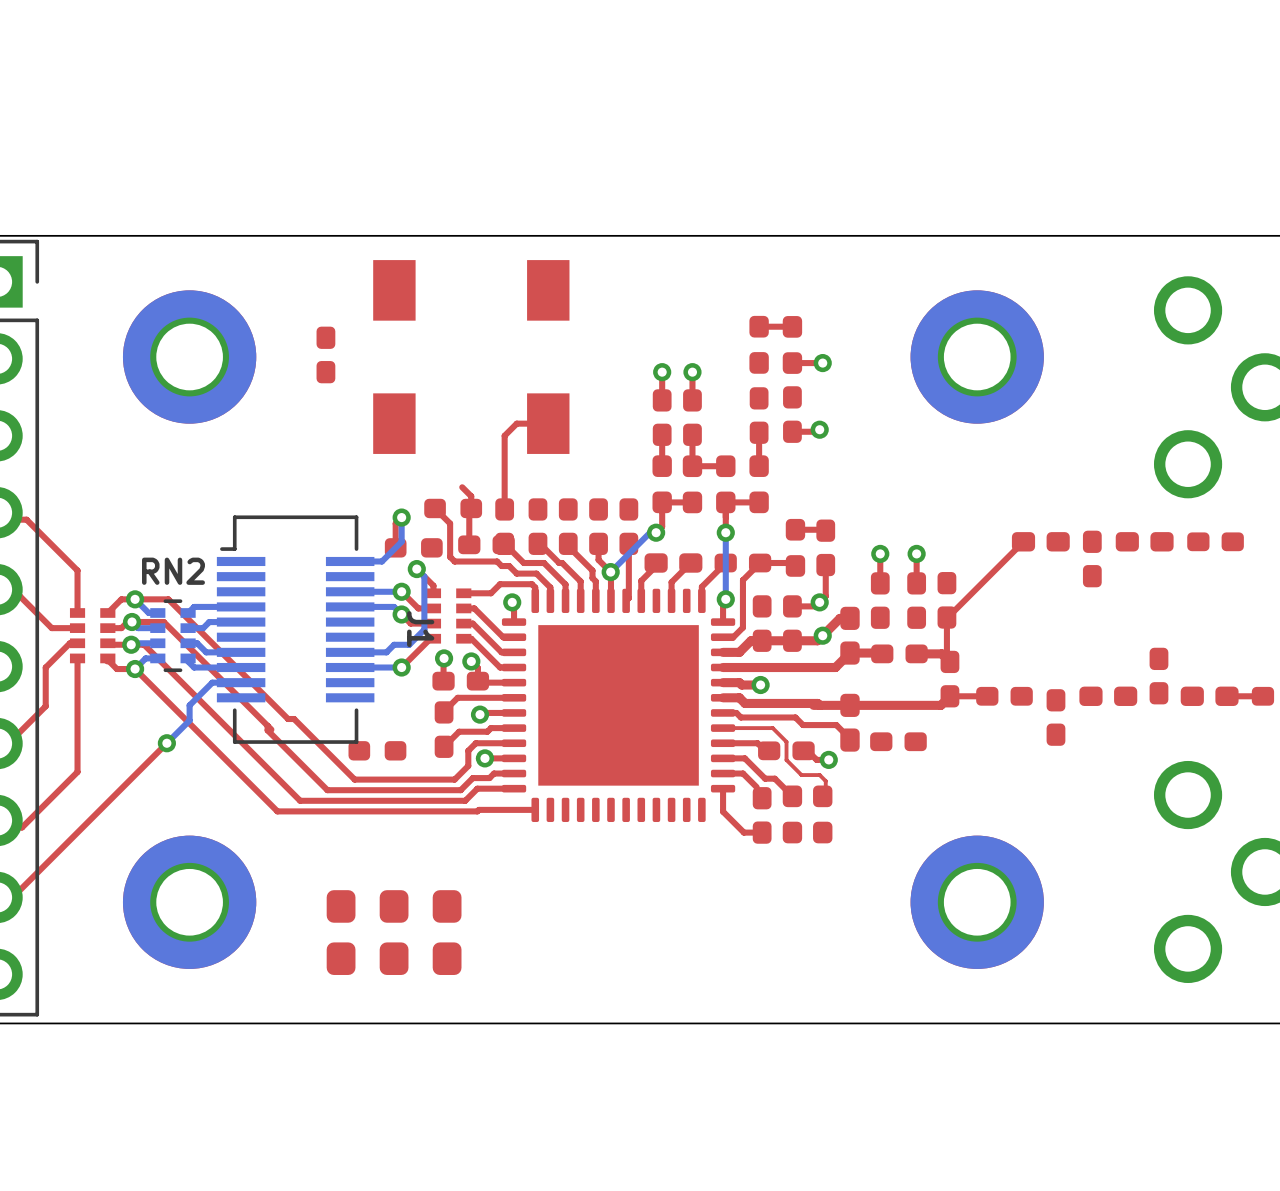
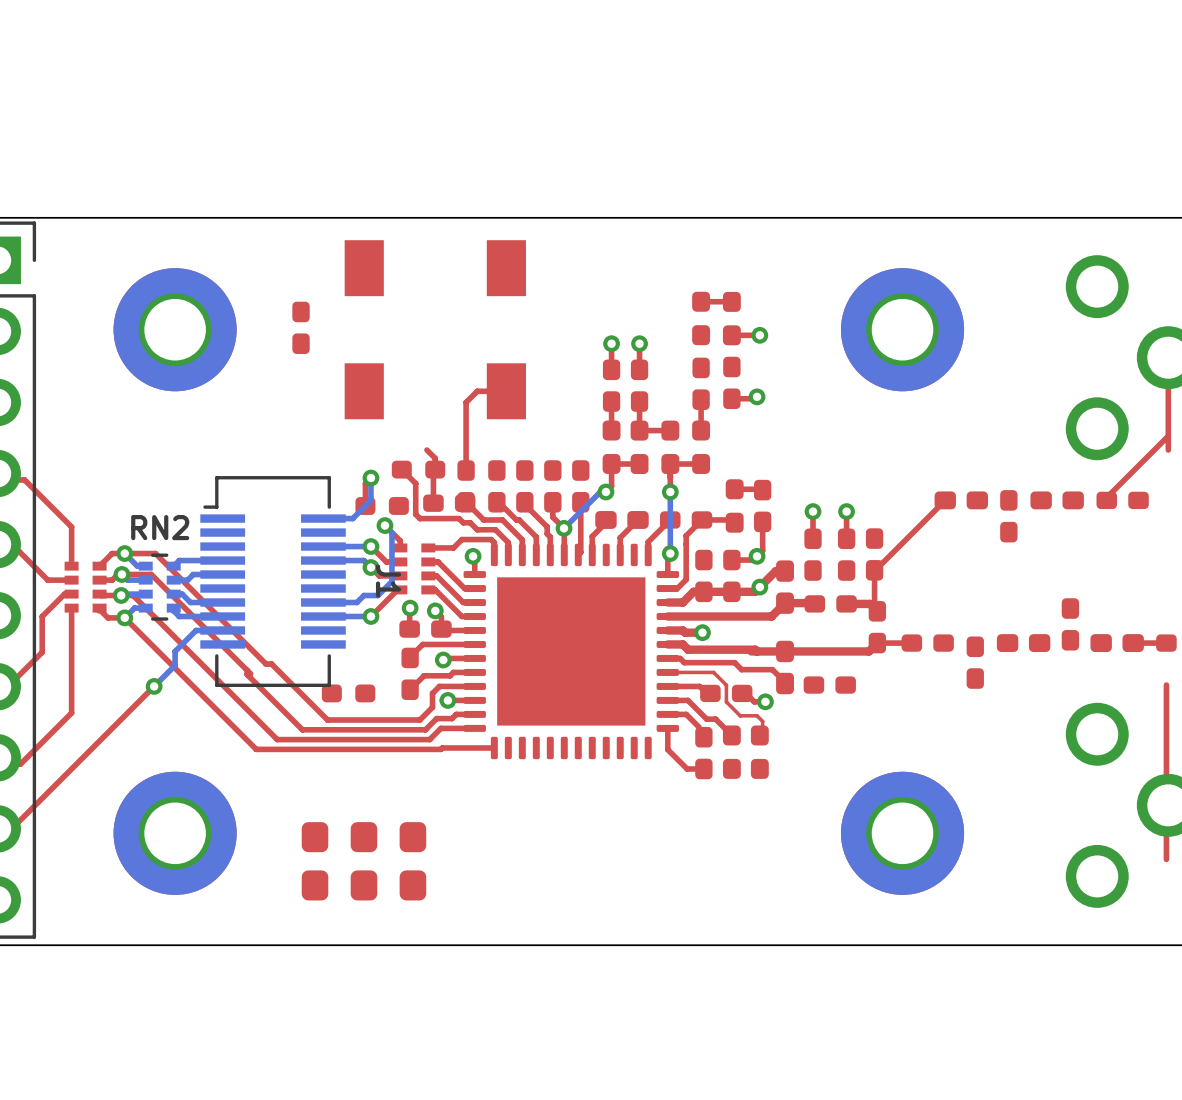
top track: none -> (1168, 357) (1168, 450)
top track: none -> (1168, 436) (1106, 497) (1106, 500)
top track: none -> (1166, 685) (1166, 859)

